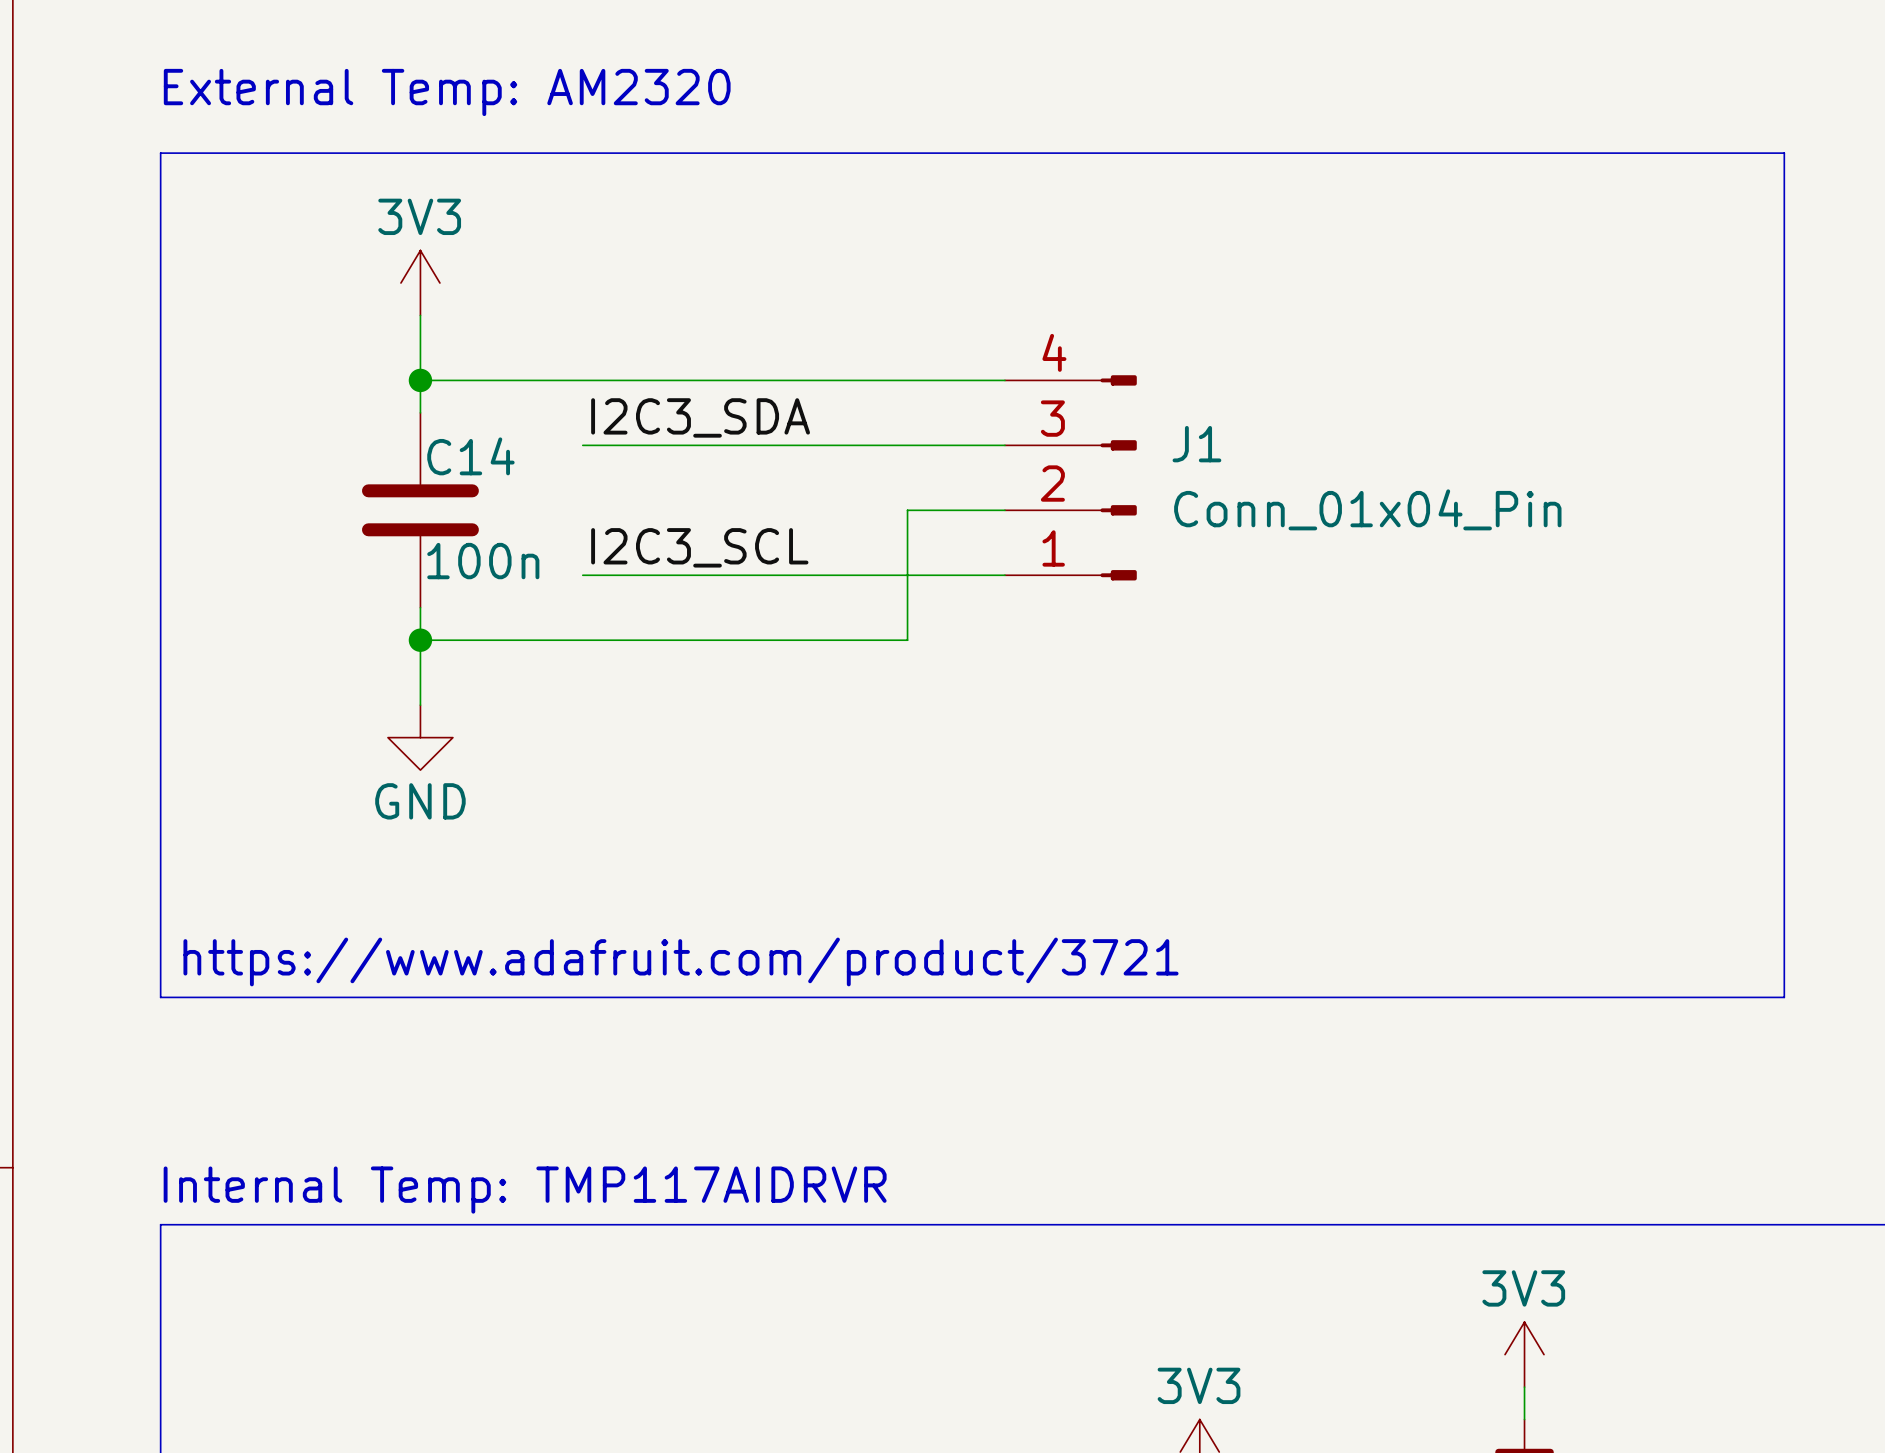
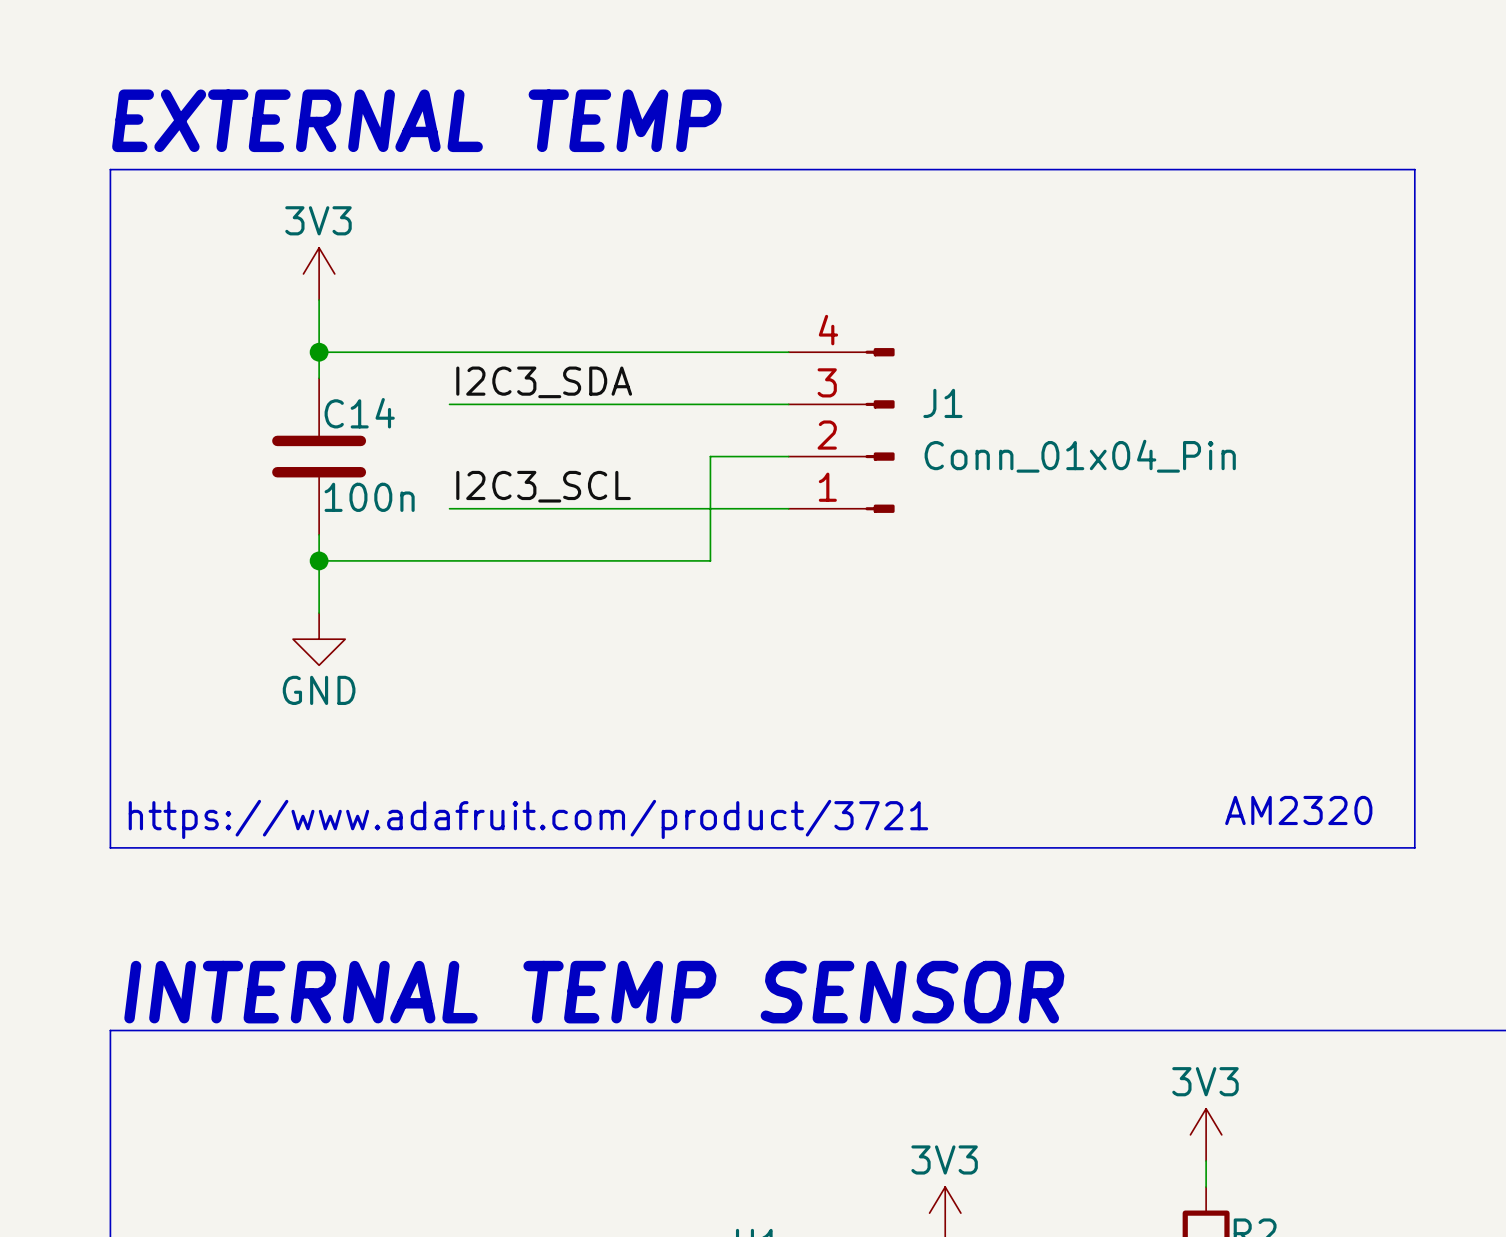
text: External Temp: AM2320 (447, 92) -> none
text: none -> EXTERNAL TEMP (416, 120)
text: none -> AM2320 (1298, 810)
text: none -> INTERNAL TEMP SENSOR (594, 992)
text: Internal Temp: TMP117AIDRVR (525, 1190) -> none

